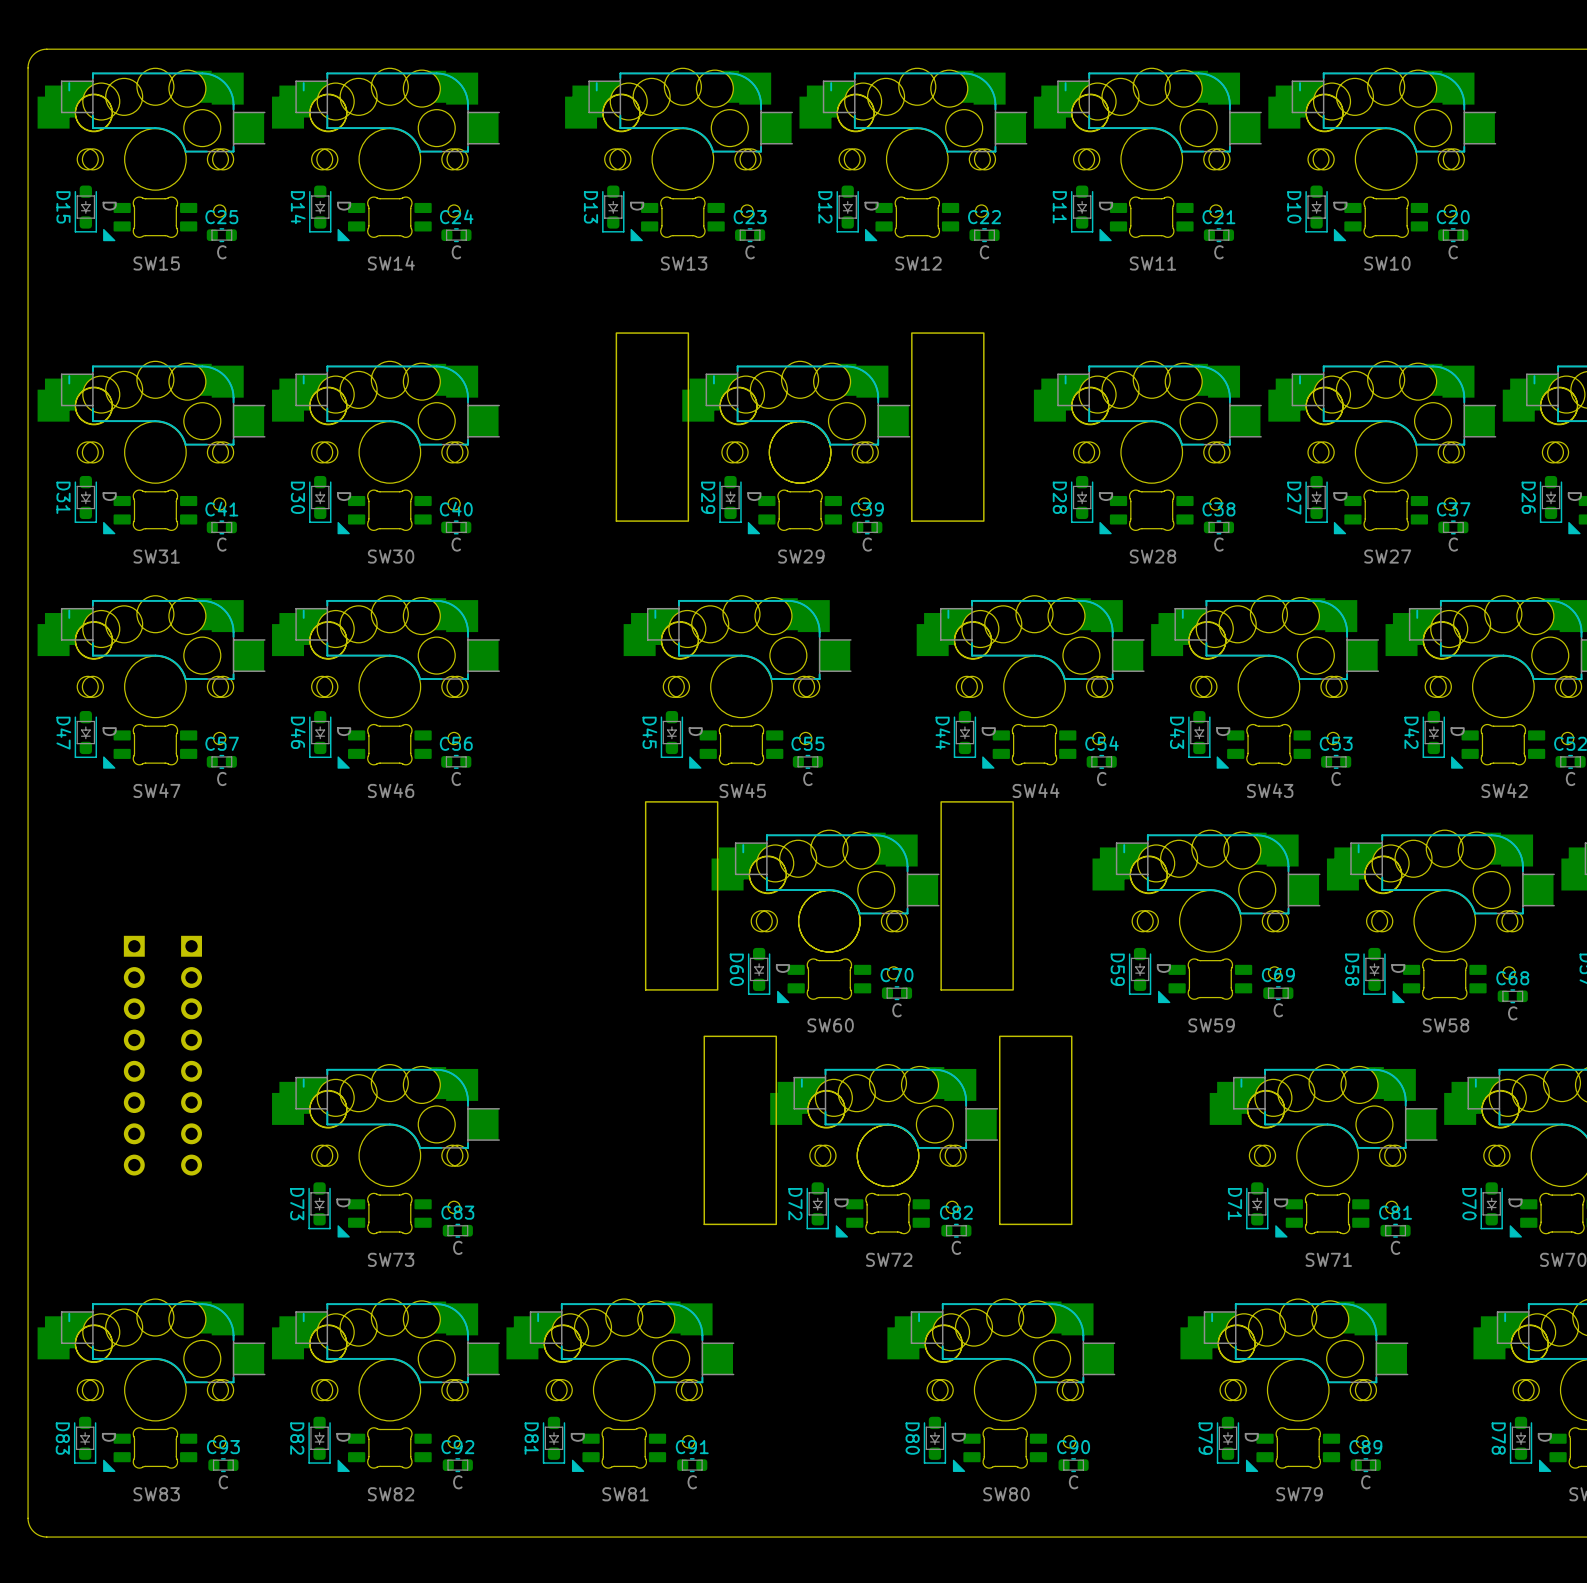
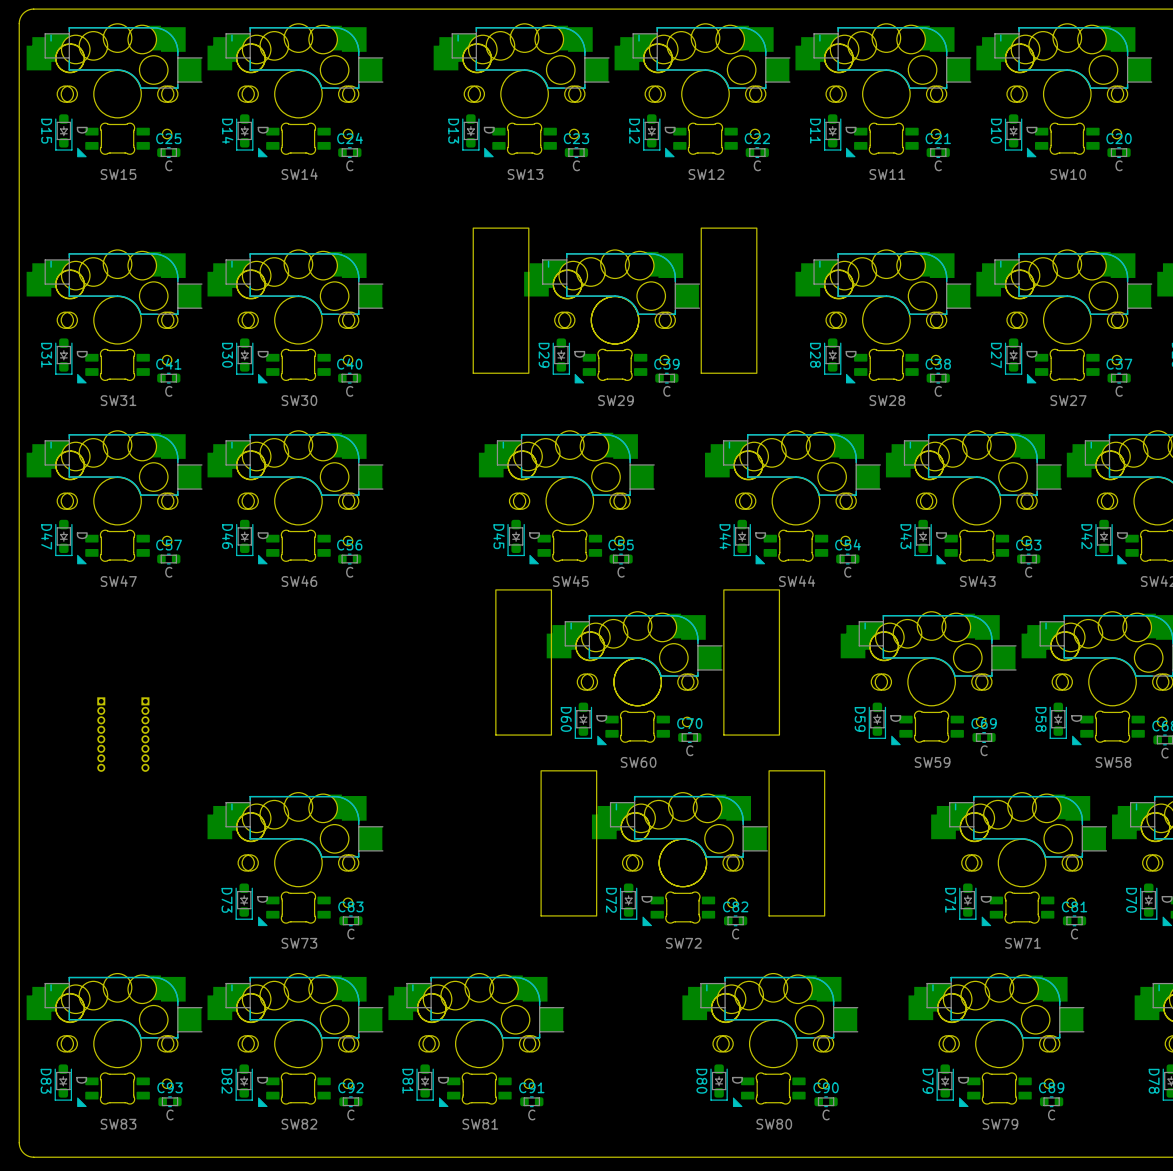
part: none -> (101, 734)
part: none -> (145, 734)
part: (134, 1055) -> none
part: (191, 1055) -> none

